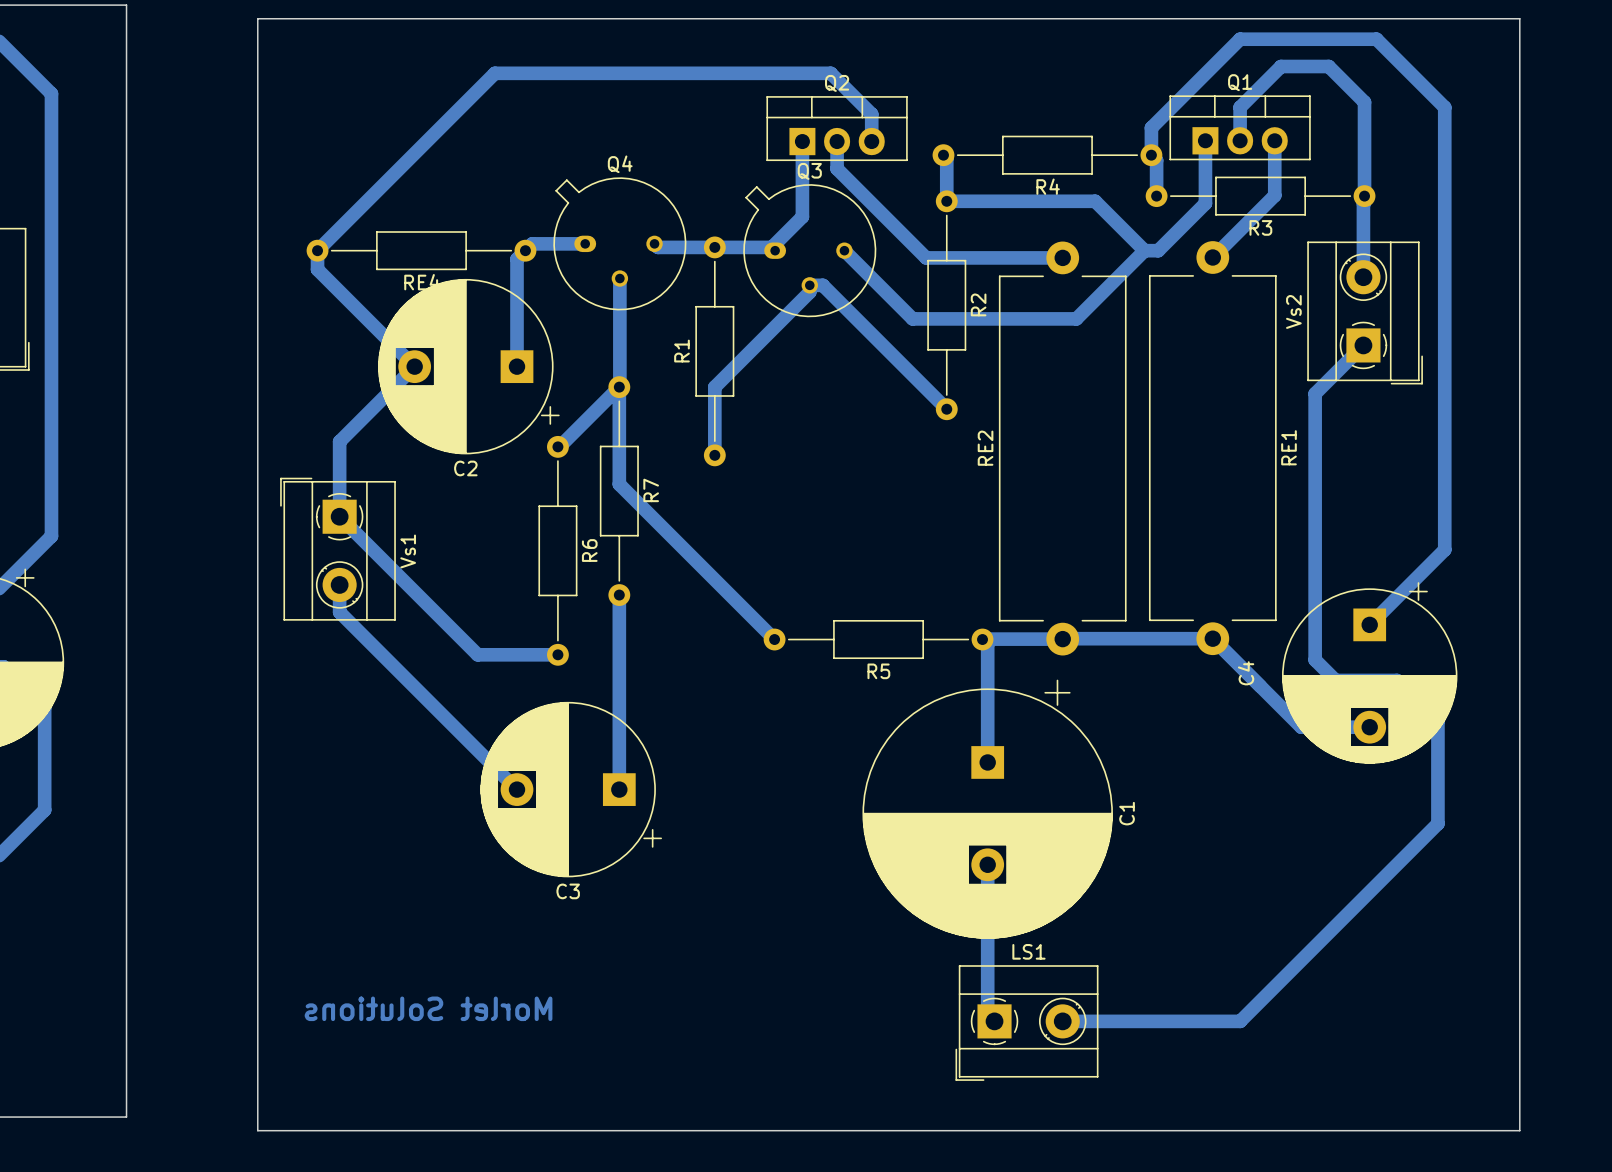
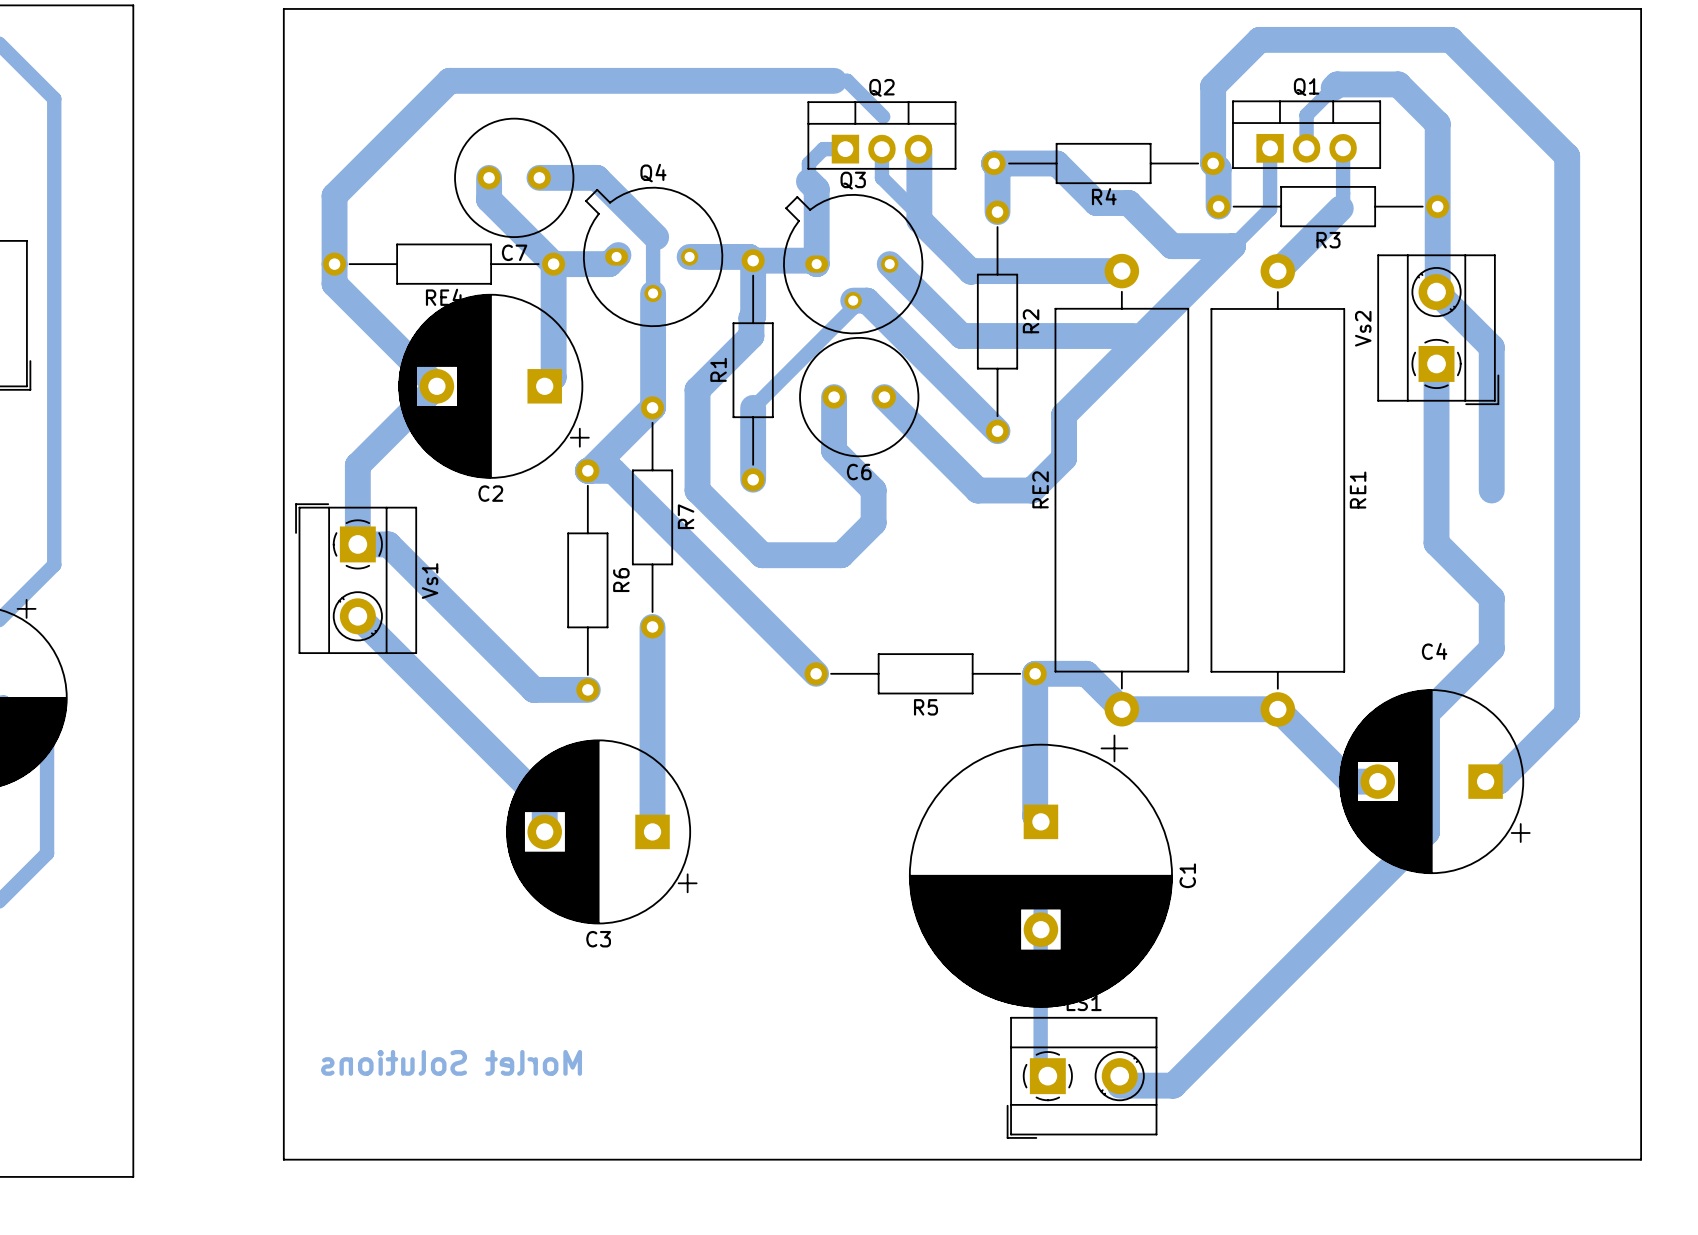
board edge: (257, 18) (1519, 18) (1519, 1130) (257, 1130) (257, 18) -> (283, 8) (283, 1159) (1641, 1159) (1641, 8) (283, 8)
bottom track: (1240, 109) (1281, 66) (1328, 66) (1364, 102) (1364, 117) -> (1306, 115) (1337, 84) (1398, 84) (1437, 123)
bottom track width: thin (1364, 117) (1364, 196) -> thick (1437, 123) (1437, 206)
bottom track: (1151, 127) (1240, 39) (1376, 39) (1444, 107) (1444, 549) (1369, 624) -> (1213, 134) (1213, 86) (1259, 39) (1450, 39) (1567, 156) (1567, 713) (1498, 781) (1485, 781)
bottom track width: thin (1151, 127) (1151, 155) (1156, 160) (1156, 196) -> thick (1213, 134) (1213, 163) (1218, 168) (1218, 206)
bottom track: (802, 141) (802, 216) (771, 247) -> (845, 149) (823, 149) (808, 163) (808, 181) (816, 189) (816, 264)
bottom track: (871, 141) (871, 114) (830, 73) (494, 73) (317, 250) -> (883, 116) (847, 80) (449, 80) (334, 195) (334, 264)
bottom track: none -> (919, 149) (919, 220) (971, 271) (1121, 271)
bottom track: none -> (994, 163) (1056, 163) (1096, 203) (1128, 203) (1171, 246) (1232, 246)
bottom track width: thin (943, 155) (946, 158) (946, 201) -> thick (994, 163) (997, 166) (997, 212)
bottom track: none -> (489, 177) (489, 199) (553, 264)
C7: none -> (514, 177)
bottom track: none -> (539, 177) (596, 177) (656, 237)
bottom track: (1364, 196) (1363, 277) -> (1437, 206) (1436, 292) (1491, 347) (1491, 490)
bottom track width: thin (1272, 197) (1212, 257) -> thick (1340, 208) (1277, 271)
bottom track: (1205, 198) (1205, 203) (1158, 250) (1144, 250) (1095, 201) (946, 201) -> (1270, 209) (1232, 246)
bottom track: none -> (657, 235) (653, 240) (653, 293)
bottom track: none -> (1232, 246) (1064, 415) (1064, 458) (1031, 490) (977, 490) (884, 397)
bottom track: none -> (618, 255) (609, 264) (553, 264)
bottom track: (585, 243) (532, 243) (517, 259) (517, 366) -> (553, 264) (553, 377) (544, 386)
bottom track: (654, 243) (658, 247) (714, 247) -> (689, 256) (749, 256) (753, 260) (751, 336) (697, 389) (697, 490) (762, 555) (841, 555) (873, 522) (873, 490) (834, 450) (834, 397)
bottom track width: thin (714, 247) (771, 247) (775, 250) -> thick (753, 260) (813, 260) (816, 264)
bottom track width: thin (317, 250) (317, 269) (414, 366) (339, 441) (339, 516) -> thick (334, 264) (334, 283) (436, 386) (357, 465) (357, 544)
bottom track width: thin (844, 250) (912, 318) (1076, 318) -> thick (889, 264) (961, 336) (1134, 336)
bottom track width: thin (619, 278) (619, 386) (557, 446) -> thick (653, 293) (653, 407) (587, 470)
bottom track width: thin (809, 285) (822, 285) (946, 409) -> thick (853, 300) (867, 300) (997, 431)
bottom track: (1363, 345) (1315, 393) (1315, 659) (1335, 680) (1397, 680) (1437, 721) (1437, 823) (1240, 1021) (1062, 1021) -> (1436, 363) (1436, 543) (1491, 598) (1491, 648) (1427, 713) (1427, 831) (1173, 1085) (1119, 1085)
C6: none -> (859, 397)
bottom track: (619, 387) (619, 484) -> (589, 470) (613, 470) (652, 510)
bottom track width: thin (714, 387) (714, 455) -> thick (753, 407) (753, 479)
RE2: (1062, 448) -> none
RE1: (1212, 448) -> none
RE2: none -> (1121, 490)
RE1: none -> (1277, 490)
bottom track width: thin (619, 484) (774, 639) -> thick (652, 510) (816, 673)
bottom track: (339, 516) (477, 654) (506, 654) -> (357, 544) (388, 544) (533, 689)
bottom track: (339, 584) (339, 612) (517, 789) -> (357, 616) (544, 803) (544, 831)
bottom track width: thin (619, 595) (619, 789) -> thick (652, 626) (652, 831)
bottom track width: thin (506, 654) (557, 654) -> thick (533, 689) (587, 689)
C4 rotation: 0° (1369, 672) -> 90° clockwise (1434, 781)
bottom track: (1369, 727) (1301, 727) (1212, 638) (982, 639) (987, 644) (987, 762) -> none
bottom track: none -> (1377, 781) (1349, 781) (1277, 709) (1121, 709) (1086, 673) (1035, 673) (1035, 816) (1040, 821)
C1 position: (987, 809) -> (1040, 871)

